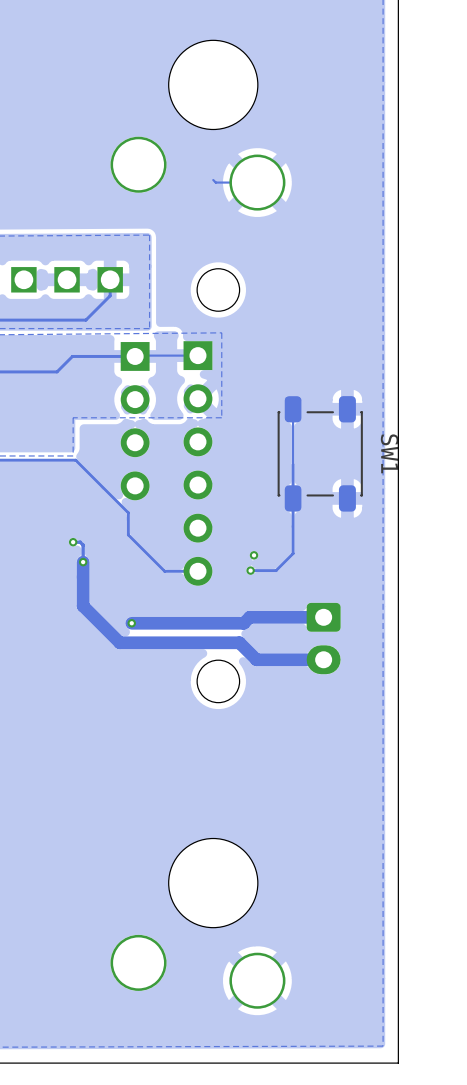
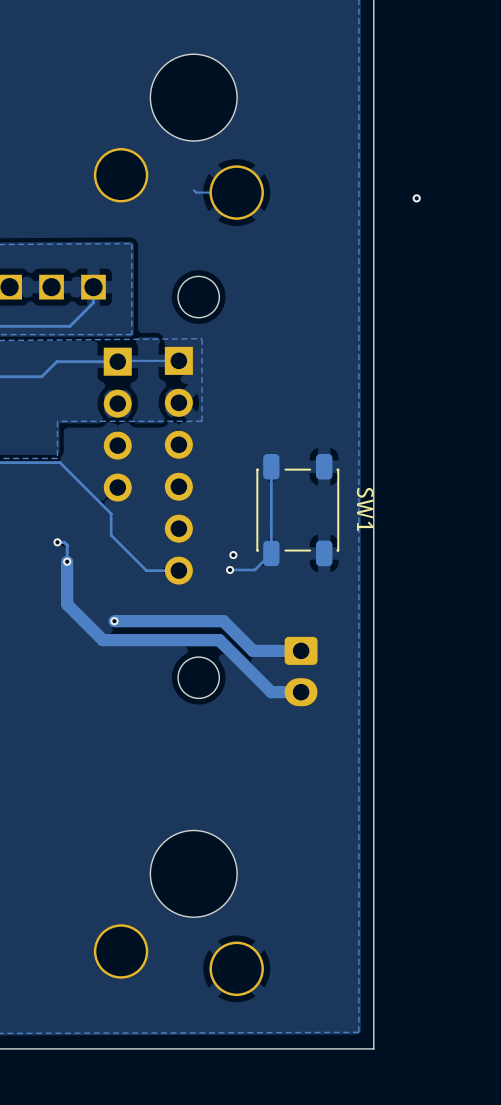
via: none -> (416, 198)
track: (293, 409) (293, 464) -> none
SW1 position: (320, 453) -> (297, 510)
track: (323, 617) (249, 617) (243, 623) -> (301, 650) (253, 650) (223, 621)
part position: (323, 638) -> (301, 671)
track: (323, 659) (256, 659) -> (301, 692) (271, 692) (235, 656)

